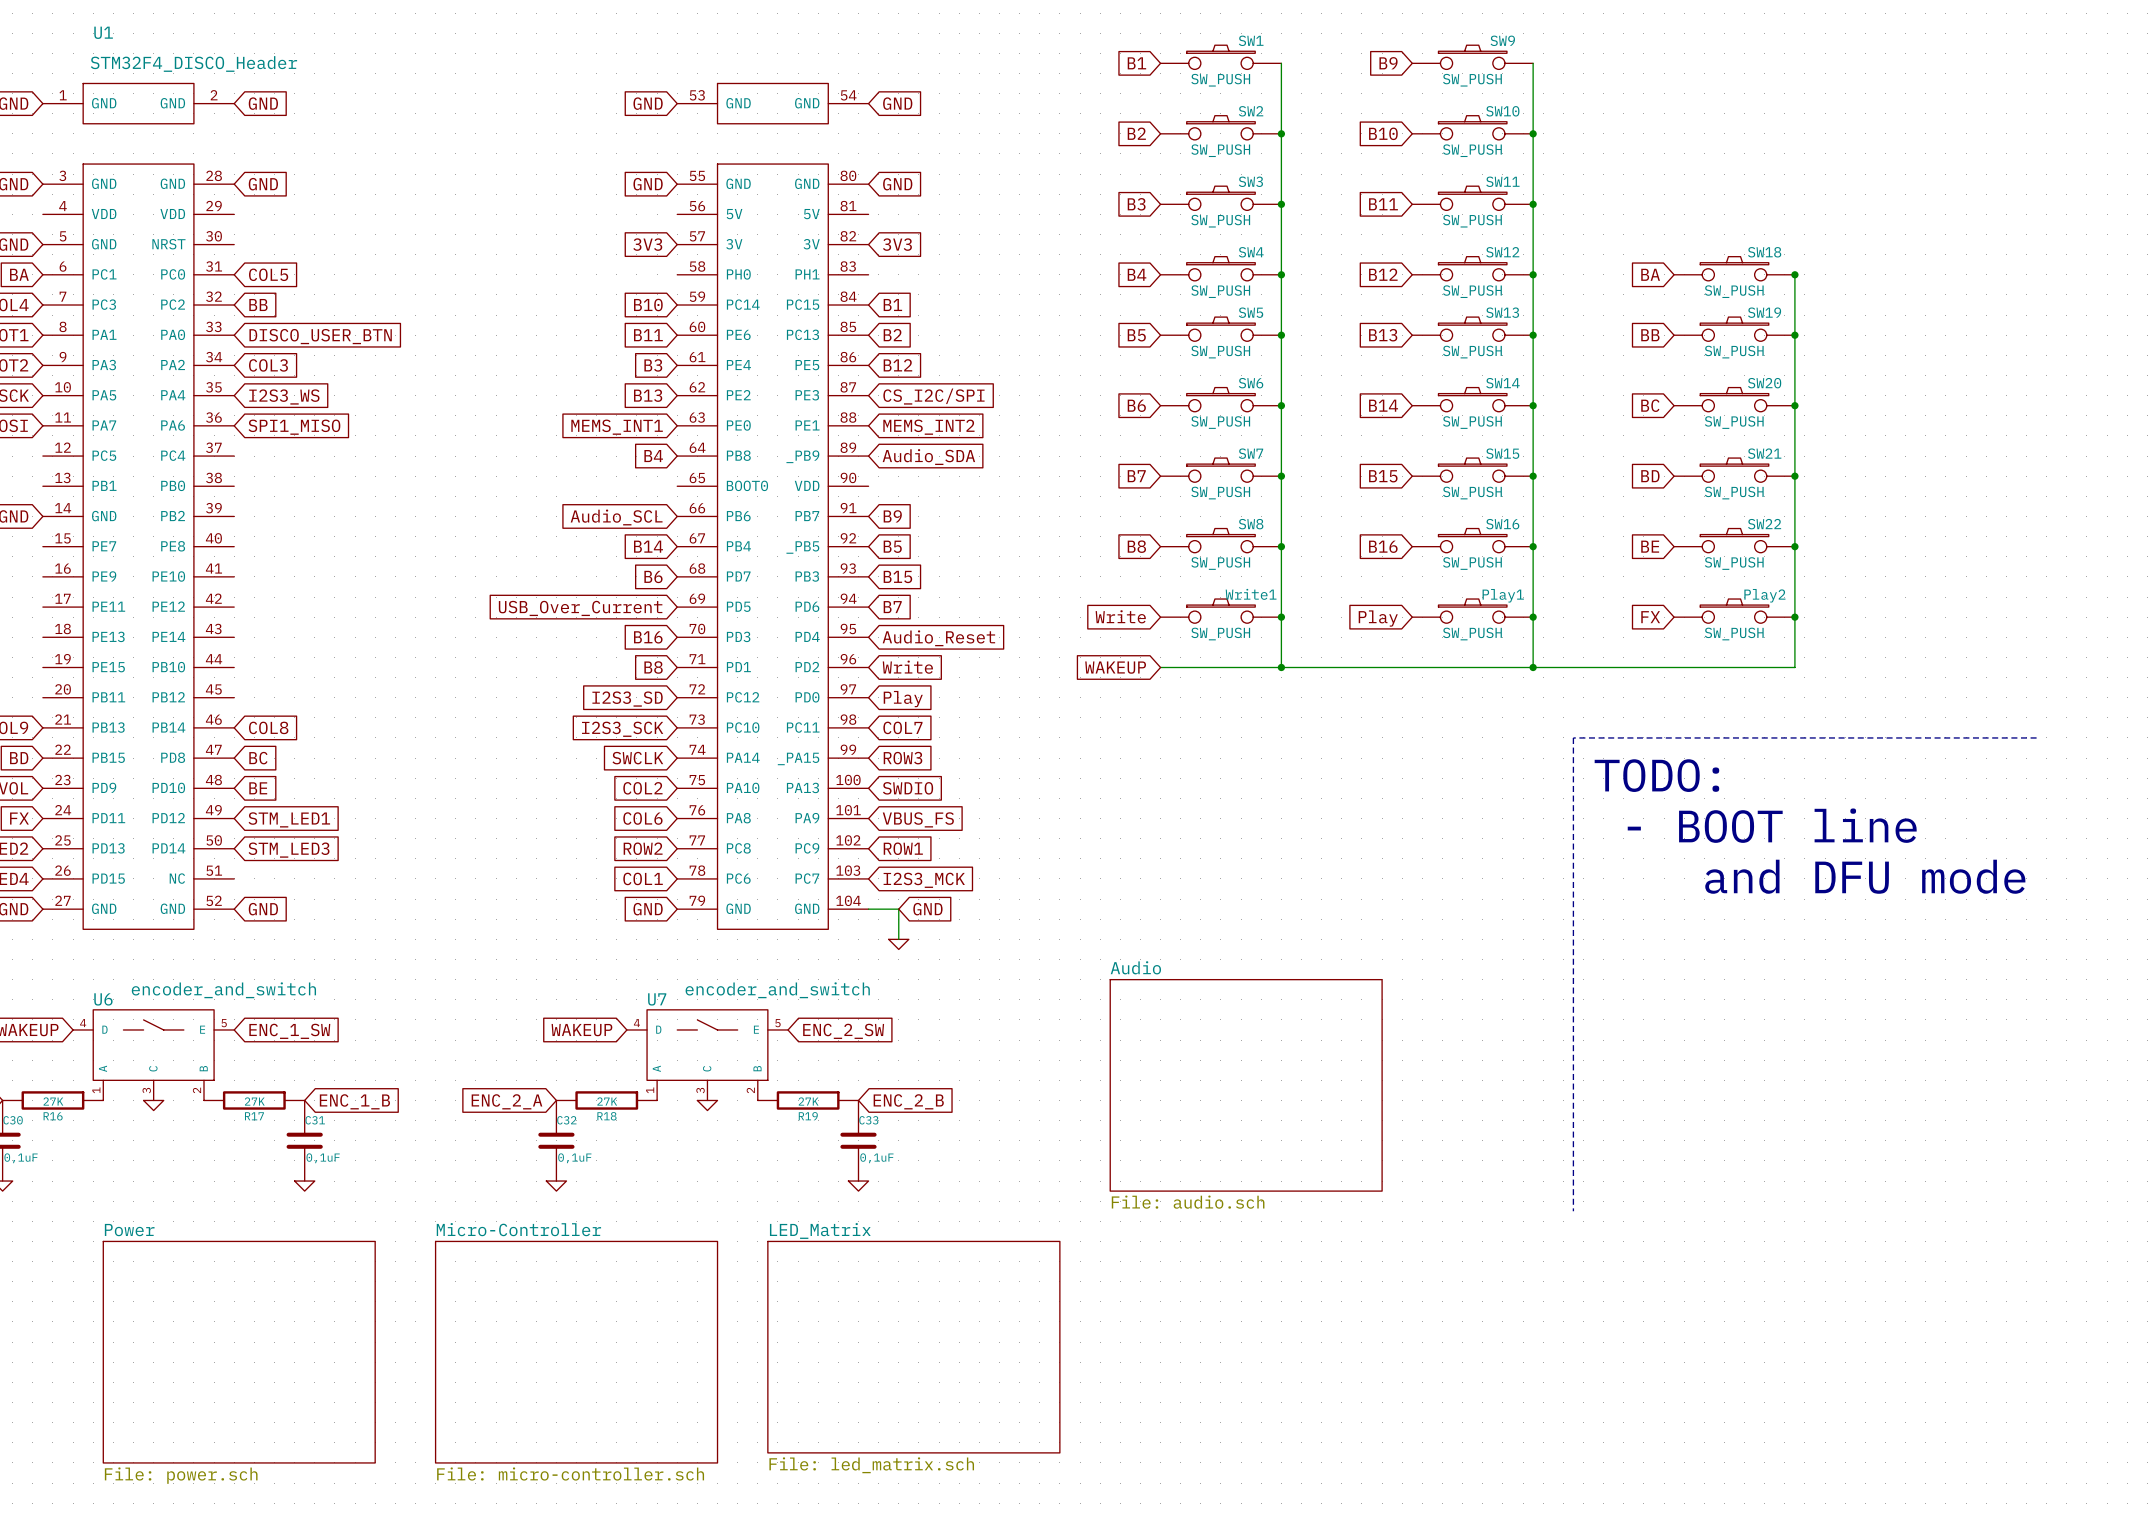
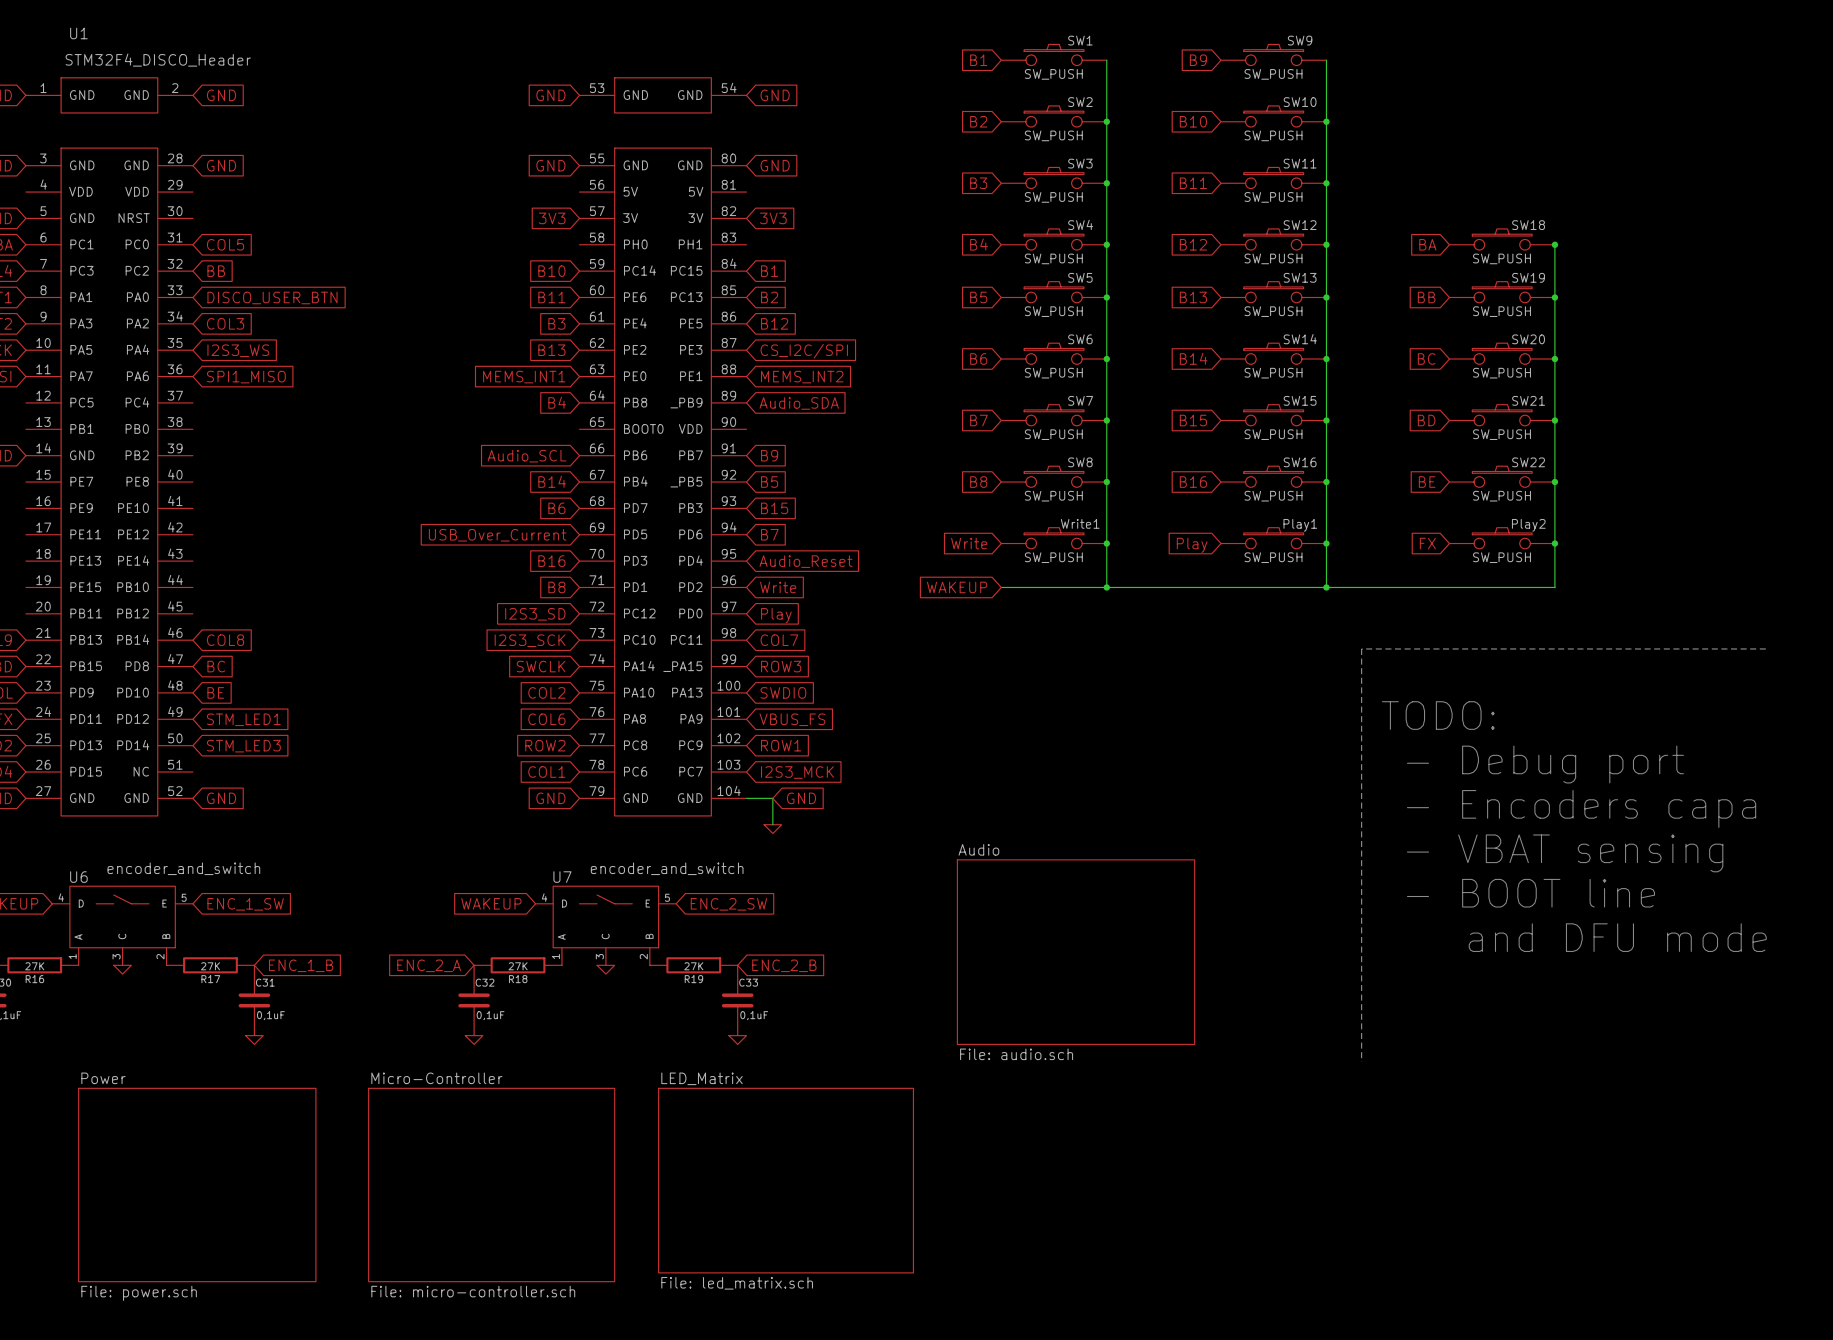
text position: TODO: (1656, 775) -> TODO: (1438, 715)
text position: - BOOT line (1772, 825) -> - BOOT line (1530, 893)
text: none -> - Debug port (1545, 764)
text position: and DFU mode (1865, 876) -> and DFU mode (1617, 937)
text: none -> - Encoders capa (1581, 808)
text: none -> - VBAT sensing (1565, 853)

